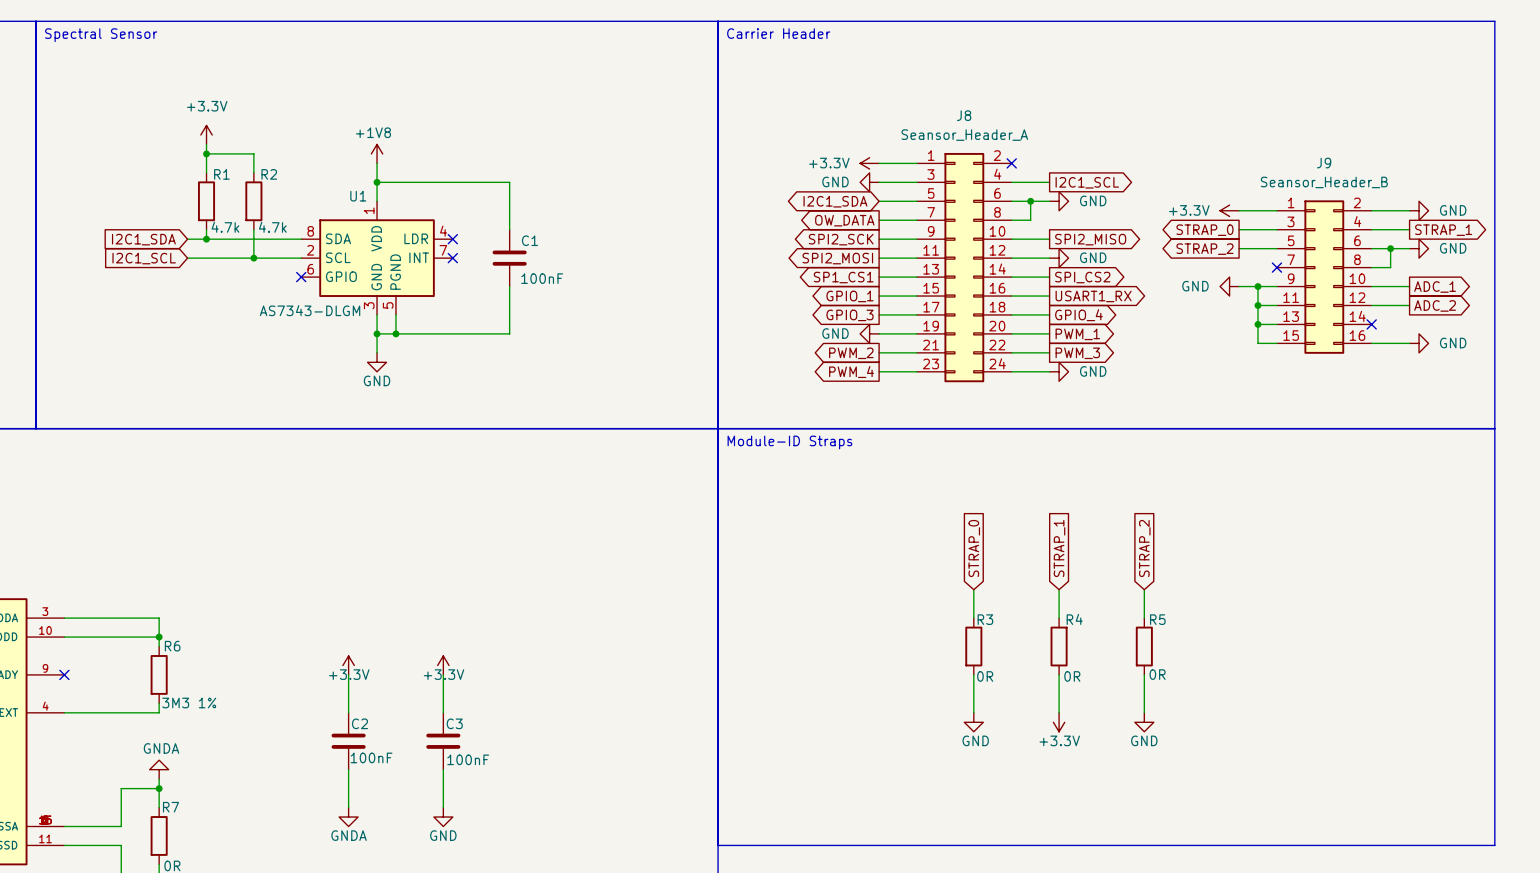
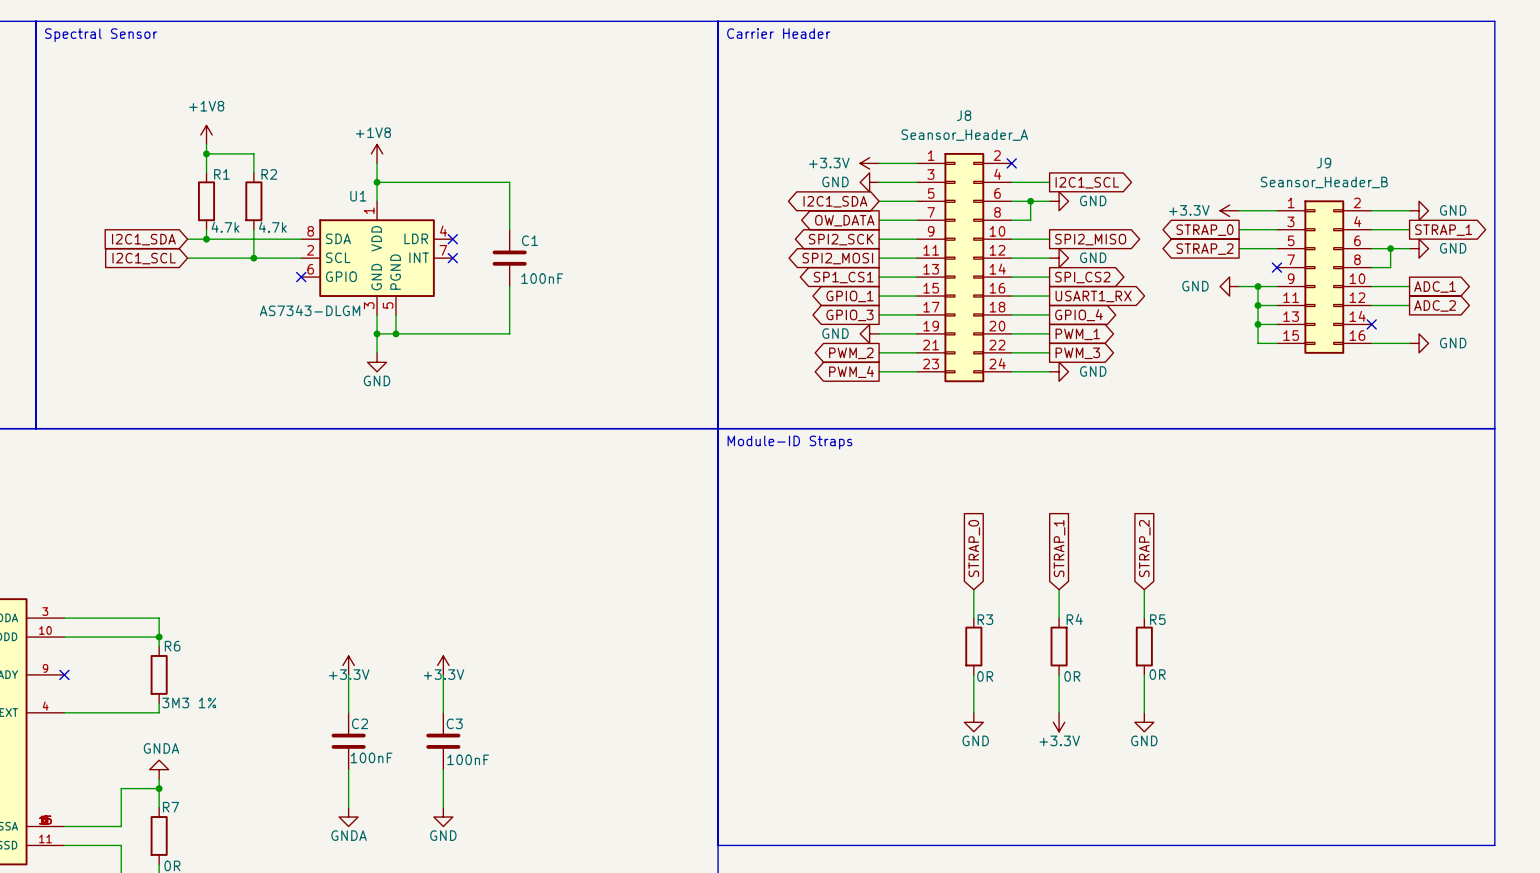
power symbol: +3.3V (206, 134) -> +1V8 (206, 134)

